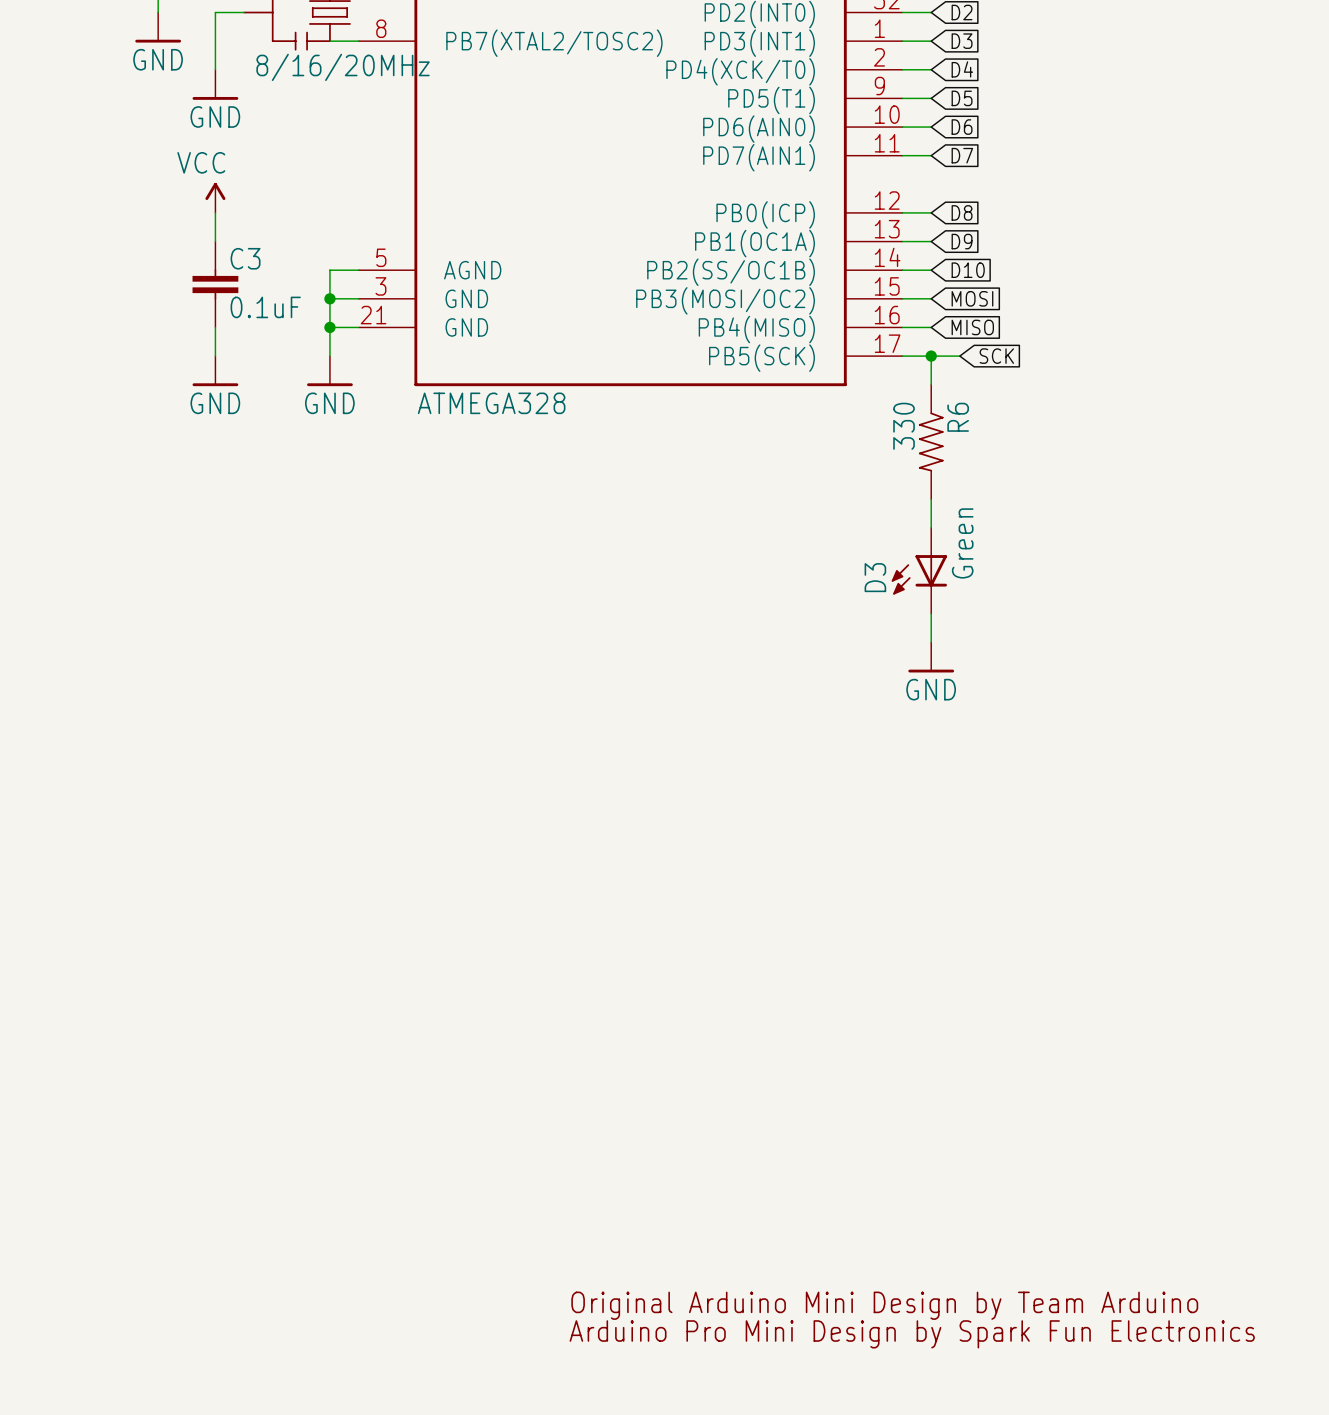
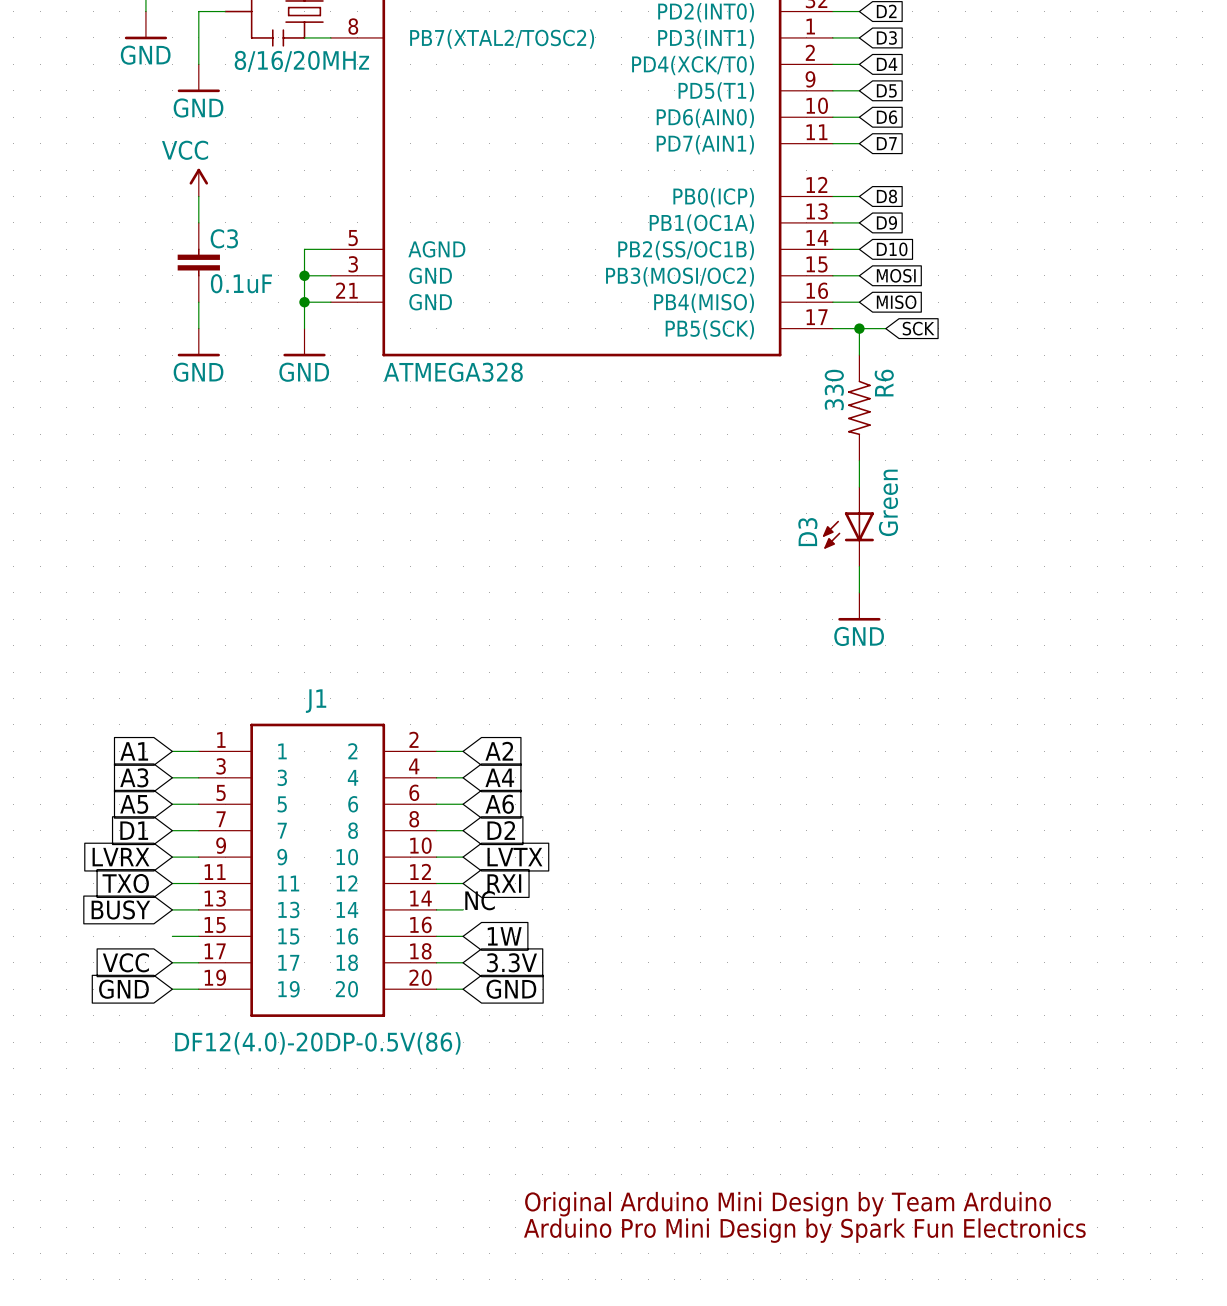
global label: none -> A1 (134, 751)
wire: none -> (172, 751) (198, 751)
wire: none -> (436, 751) (463, 751)
global label: none -> A2 (499, 751)
global label: none -> A3 (134, 777)
wire: none -> (172, 777) (198, 777)
wire: none -> (436, 777) (463, 777)
global label: none -> A4 (499, 777)
global label: none -> A5 (134, 804)
wire: none -> (172, 804) (198, 804)
wire: none -> (436, 804) (463, 804)
global label: none -> A6 (499, 804)
global label: none -> D1 (134, 830)
wire: none -> (172, 830) (198, 830)
wire: none -> (436, 830) (463, 830)
global label: none -> D2 (501, 830)
global label: none -> LVRX (121, 857)
wire: none -> (172, 857) (198, 857)
wire: none -> (436, 857) (463, 857)
global label: none -> LVTX (514, 857)
J1: none -> DF12(4.0)-20DP-0.5V(86) (317, 870)
global label: none -> TXO (125, 883)
wire: none -> (172, 883) (198, 883)
wire: none -> (436, 883) (463, 883)
global label: none -> RXI (504, 883)
label: none -> NC (480, 900)
global label: none -> BUSY (120, 909)
wire: none -> (172, 909) (198, 909)
wire: none -> (436, 909) (463, 909)
wire: none -> (172, 936) (198, 936)
wire: none -> (436, 936) (463, 936)
global label: none -> 1W (504, 936)
global label: none -> VCC (125, 962)
wire: none -> (172, 962) (198, 962)
wire: none -> (436, 962) (463, 962)
global label: none -> 3.3V (511, 962)
global label: none -> GND (123, 989)
wire: none -> (172, 989) (198, 989)
wire: none -> (436, 989) (463, 989)
global label: none -> GND (511, 989)

